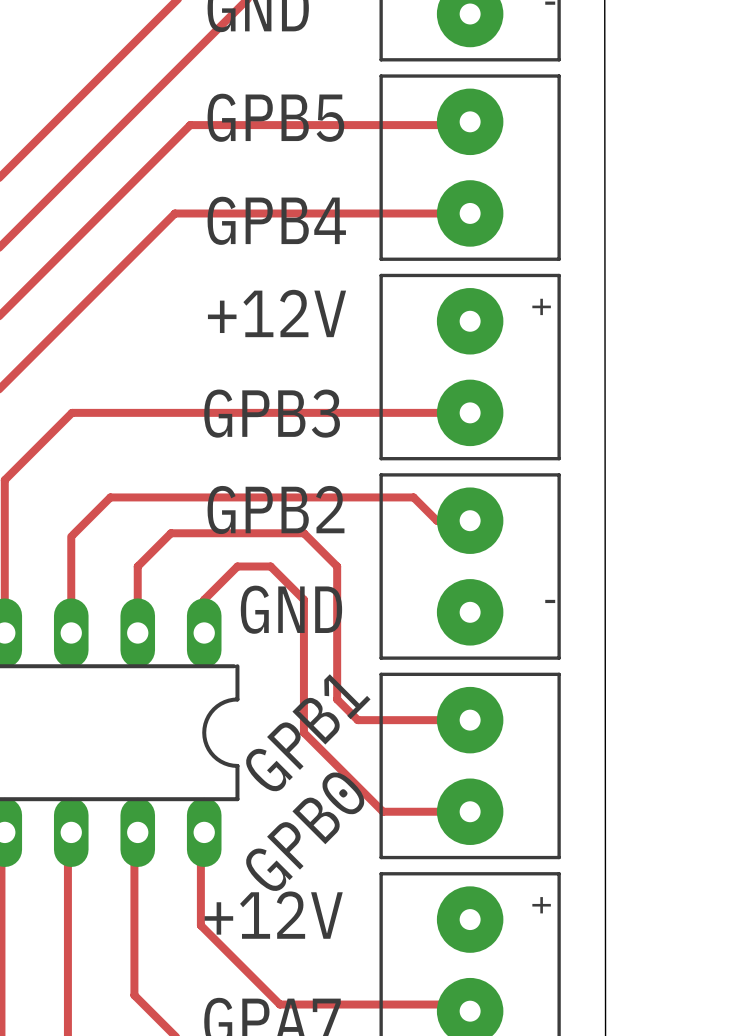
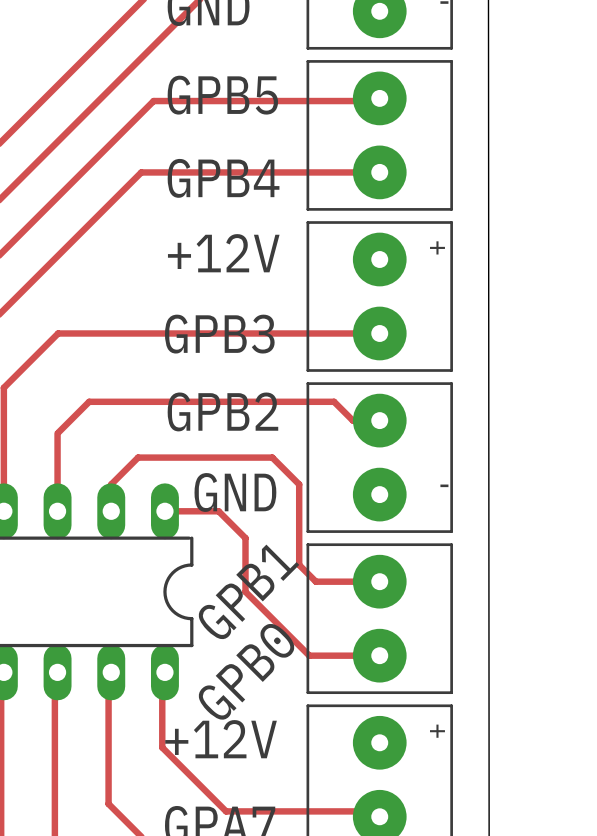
track: (237, 566) (204, 599) (204, 632) -> (191, 457) (138, 457) (111, 484)
track: (270, 566) (303, 599) (303, 666) -> (164, 511) (218, 511) (245, 538)
track: (137, 599) (137, 566) (170, 533) (303, 533) (337, 566) (337, 699) (357, 720) (391, 720) -> (218, 457) (272, 457) (299, 484) (299, 564) (315, 581)

